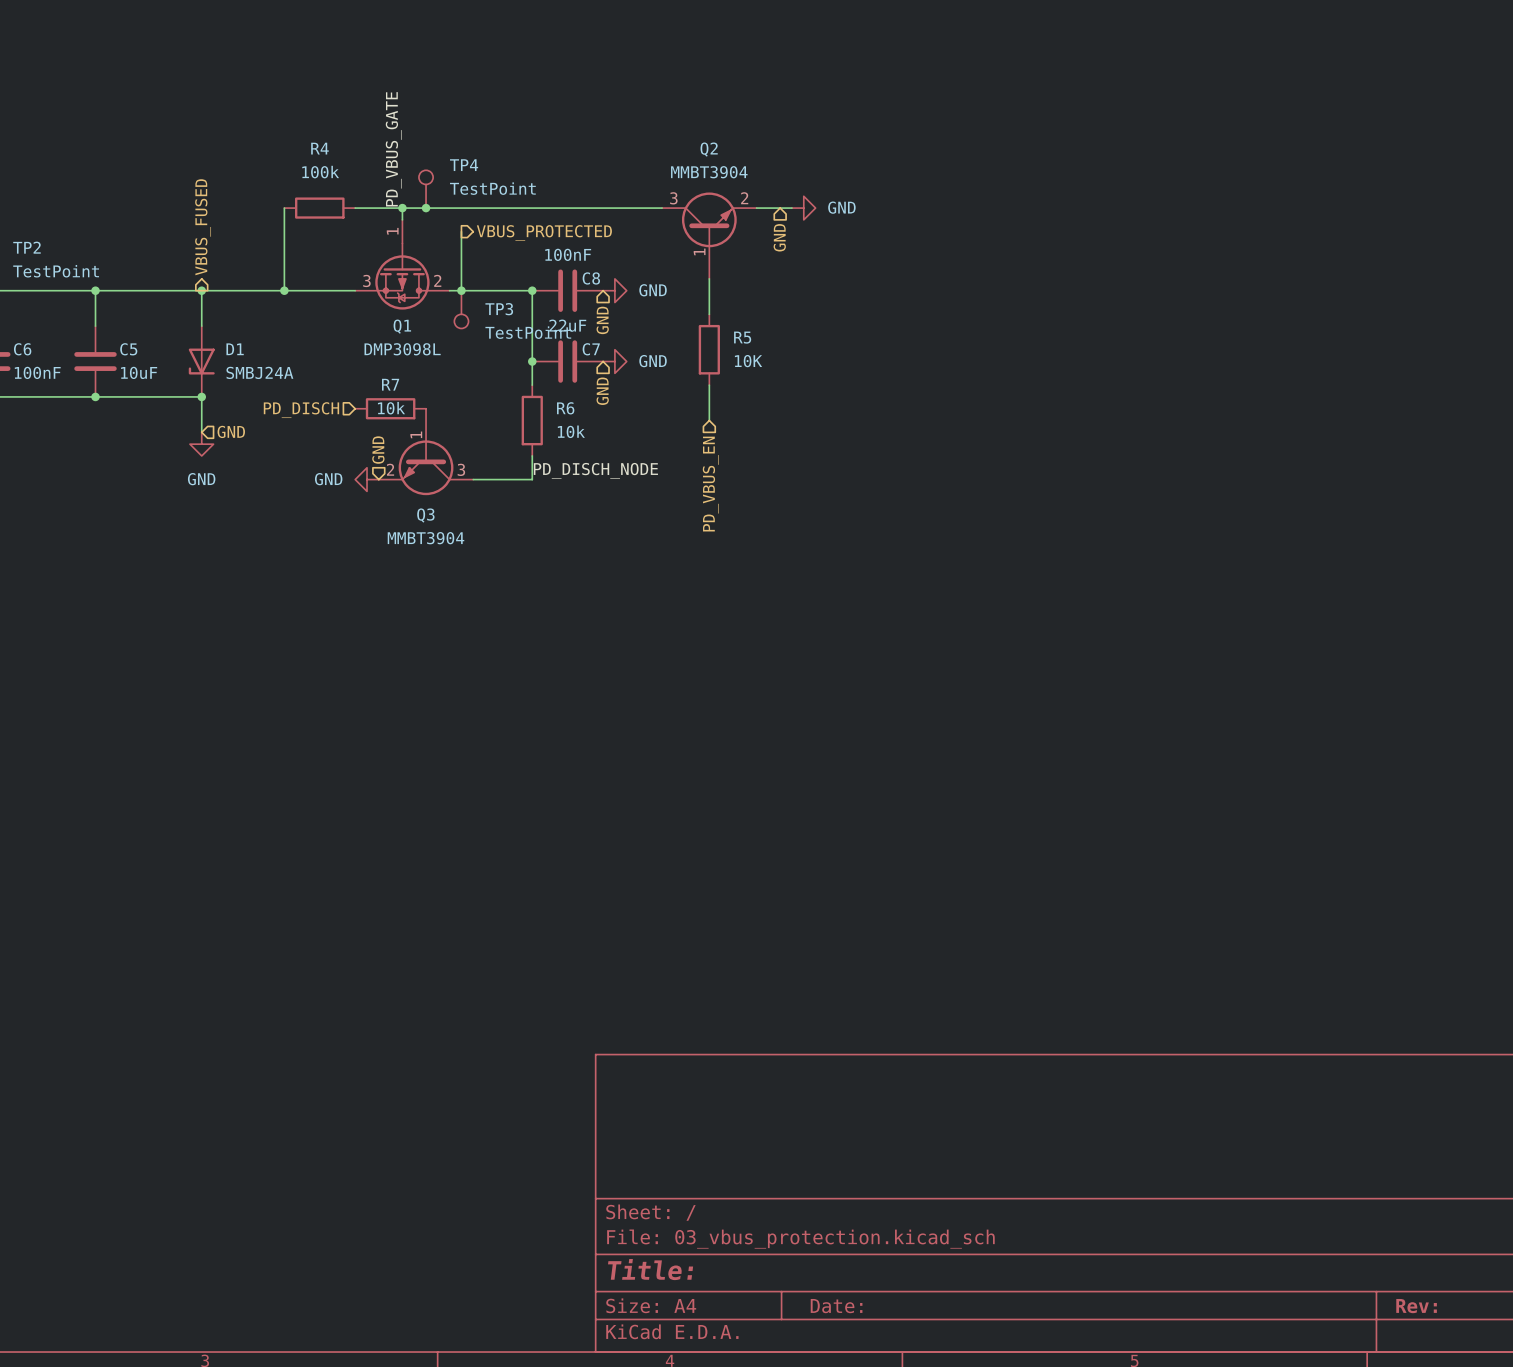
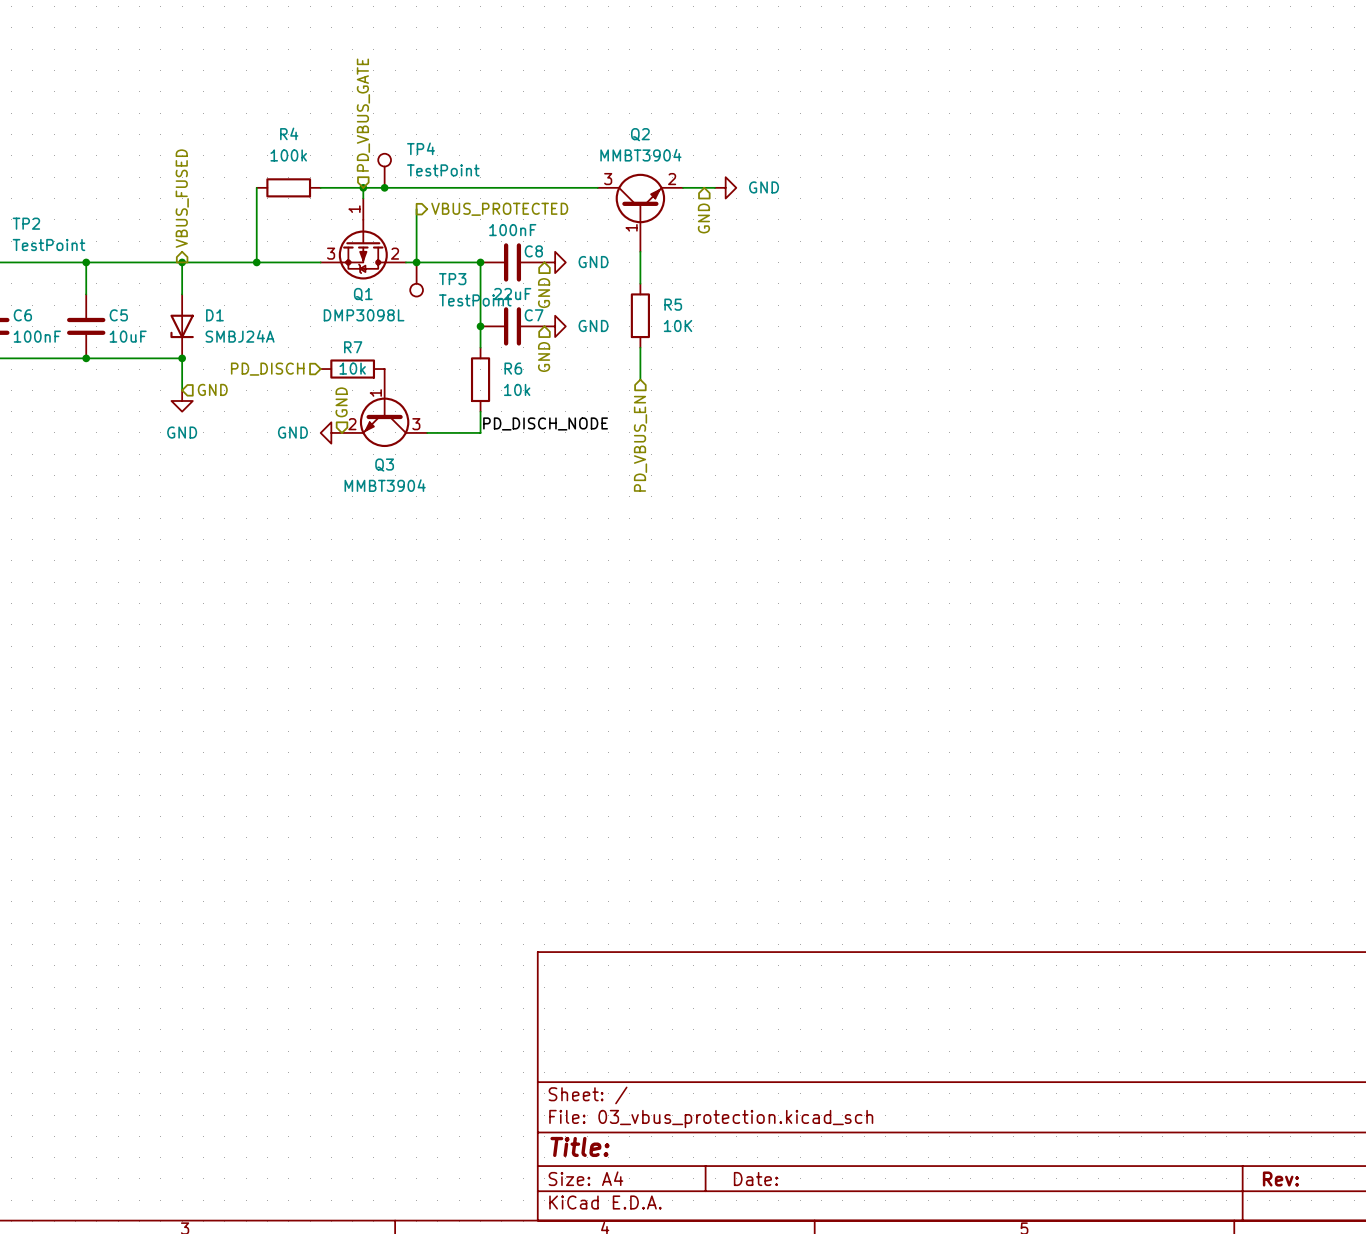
hierarchical label: none -> PD_VBUS_GATE (363, 115)
label: PD_VBUS_GATE (393, 149) -> none

